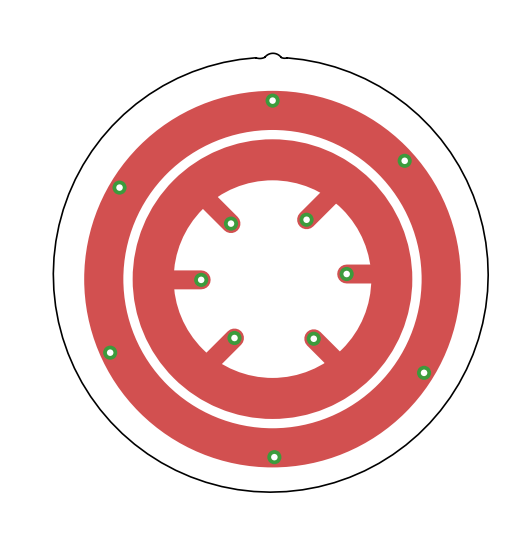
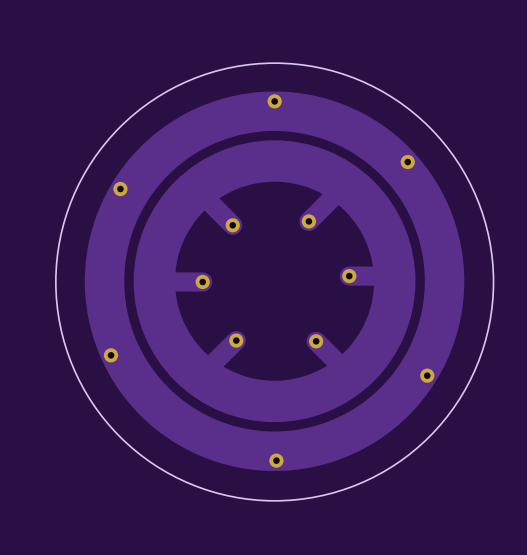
board edge: (264, 57) (223, 62) (177, 78) (136, 103) (112, 125) (91, 151) (68, 194) (58, 225) (53, 273) (58, 322) (74, 368) (90, 396) (122, 433) (161, 462) (190, 476) (221, 486) (270, 492) (318, 486) (349, 477) (379, 463) (418, 434) (440, 410) (466, 369) (482, 323) (488, 274) (482, 226) (466, 180) (440, 139) (418, 115) (379, 86) (350, 72) (319, 62) (282, 57) (274, 53) (264, 57) -> none
round board edge: none -> [55, 63, 494, 501]

